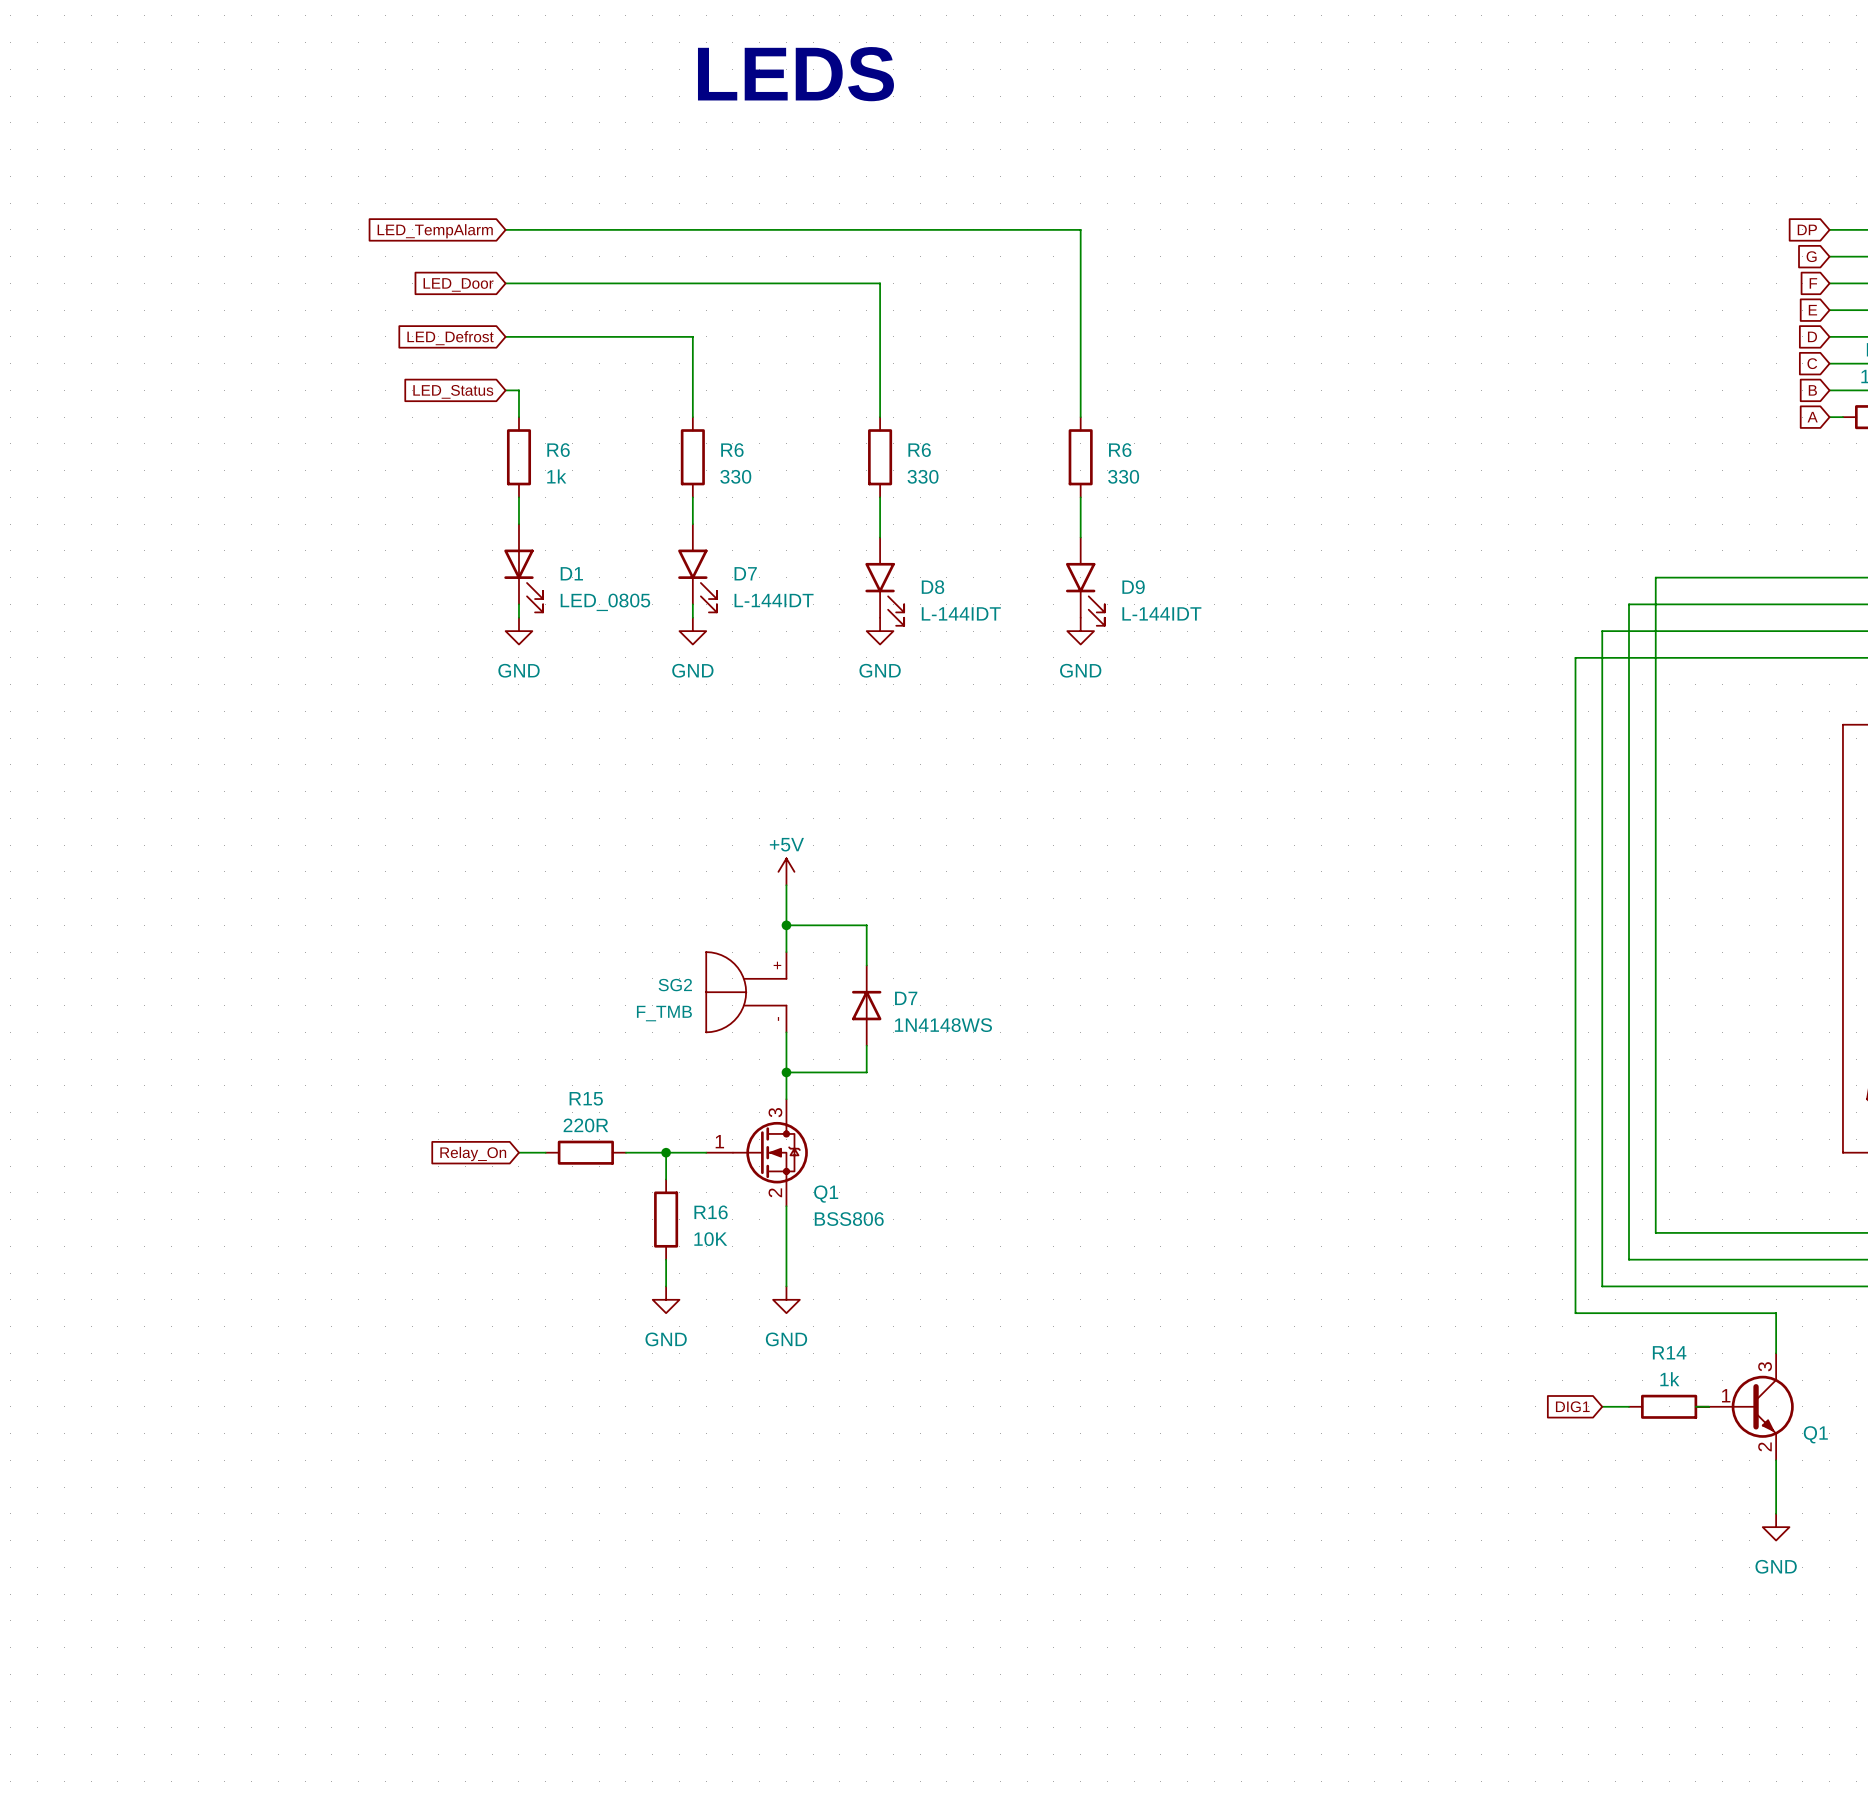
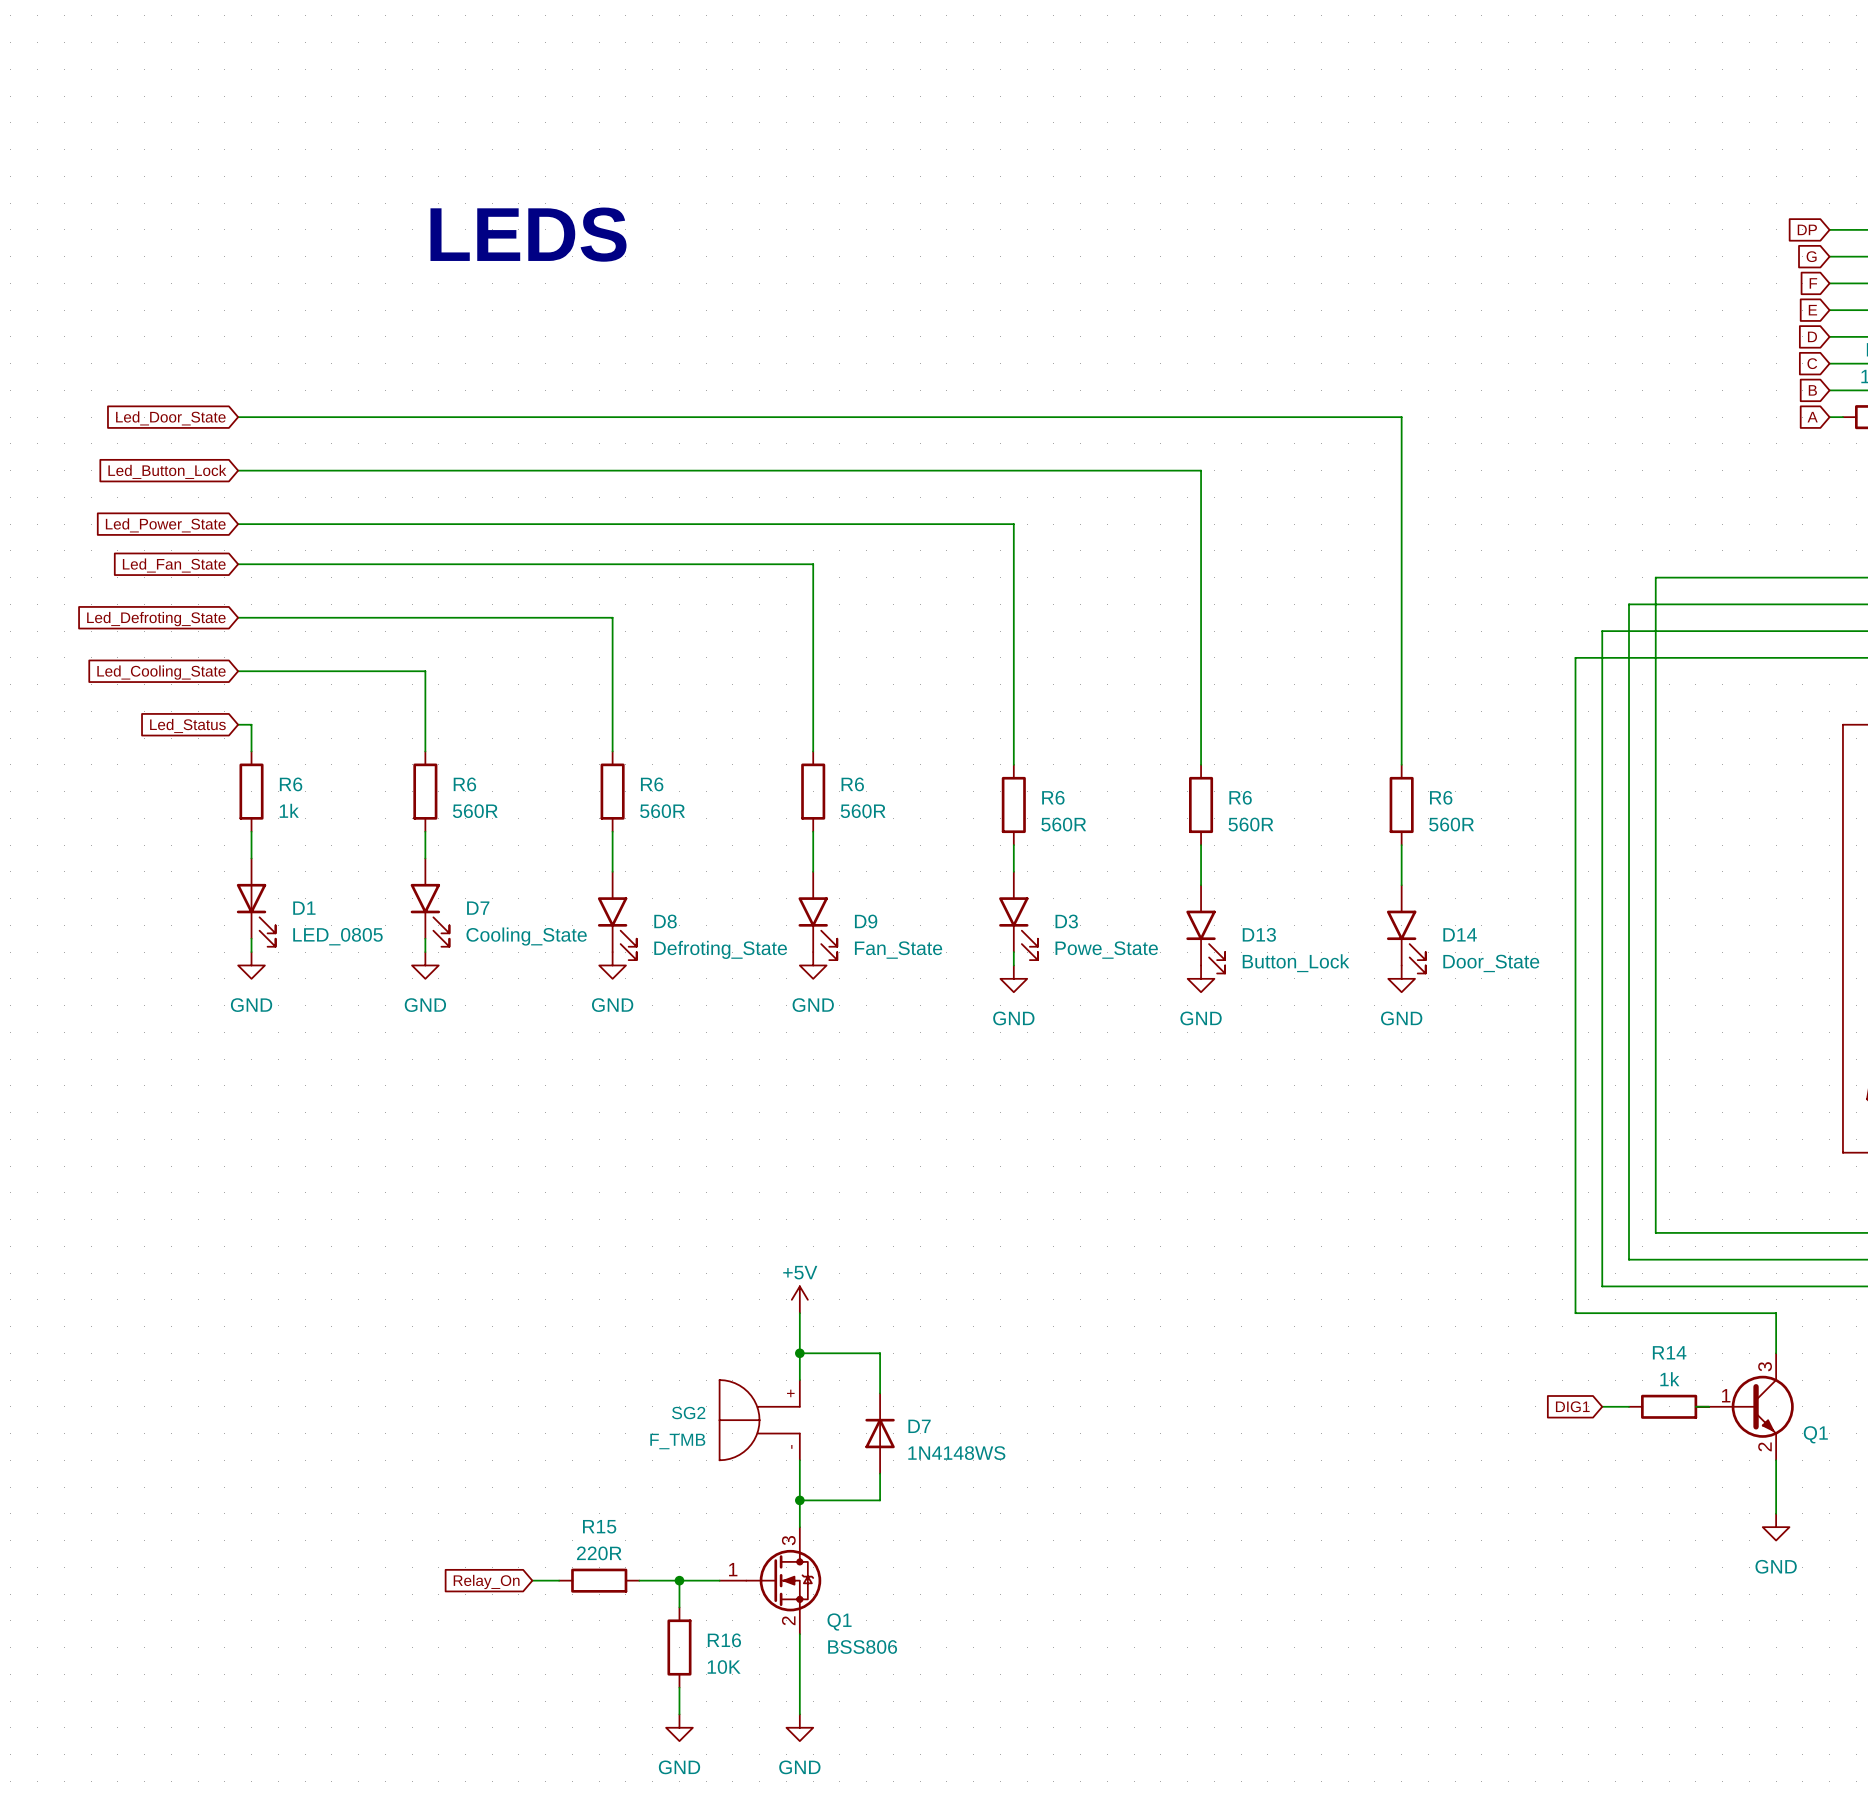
text: LEDS (795, 74) -> none
wire: (505, 229) (1080, 229) (1080, 417) -> none
global label: LED_TempAlarm (435, 231) -> none
text: none -> LEDS (528, 234)
wire: (505, 283) (880, 283) (880, 417) -> none
global label: LED_Door (458, 284) -> none
wire: (505, 336) (692, 336) (692, 417) -> none
global label: LED_Defrost (450, 338) -> none
wire: (505, 390) (518, 390) (518, 417) -> none
global label: LED_Status (453, 391) -> none
wire: none -> (238, 417) (1401, 417) (1401, 764)
global label: none -> Led_Door_State (170, 418)
R6: 1k (518, 457) -> none
R6: 330 (692, 457) -> none
R6: 330 (880, 457) -> none
R6: 330 (1080, 457) -> none
wire: none -> (238, 470) (1201, 470) (1201, 764)
global label: none -> Led_Button_Lock (167, 471)
wire: (518, 497) (518, 524) -> none
wire: (692, 497) (692, 524) -> none
wire: (880, 497) (880, 537) -> none
wire: (1080, 497) (1080, 537) -> none
wire: none -> (238, 524) (1013, 524) (1013, 764)
global label: none -> Led_Power_State (165, 525)
wire: none -> (238, 564) (813, 564) (813, 751)
global label: none -> Led_Fan_State (174, 565)
D1 position: (523, 568) -> (256, 902)
D7: L-144IDT (697, 568) -> none
D8 position: (884, 581) -> (617, 915)
D9 position: (1085, 581) -> (817, 915)
wire: (518, 604) (518, 617) -> none
wire: (692, 604) (692, 617) -> none
D8 value: L-144IDT (961, 613) -> Defroting_State (720, 949)
D9 value: L-144IDT (1161, 613) -> Fan_State (898, 950)
wire: none -> (238, 617) (612, 617) (612, 751)
global label: none -> Led_Defroting_State (156, 619)
power symbol: GND (518, 631) -> none
power symbol: GND (692, 631) -> none
power symbol: GND (880, 631) -> none
power symbol: GND (1080, 631) -> none
wire: none -> (238, 671) (425, 671) (425, 751)
global label: none -> Led_Cooling_State (161, 672)
wire: none -> (238, 724) (251, 724) (251, 751)
global label: none -> Led_Status (187, 725)
R6: none -> 1k (251, 791)
R6: none -> 560R (425, 791)
R6: none -> 560R (612, 791)
R6: none -> 560R (813, 791)
R6: none -> 560R (1013, 804)
R6: none -> 560R (1201, 804)
R6: none -> 560R (1401, 804)
wire: none -> (251, 831) (251, 858)
wire: none -> (425, 831) (425, 858)
wire: none -> (612, 831) (612, 871)
wire: none -> (813, 831) (813, 871)
wire: none -> (1013, 845) (1013, 871)
wire: none -> (1201, 845) (1201, 885)
wire: none -> (1401, 845) (1401, 885)
power symbol: +5V (786, 871) -> none
wire: (786, 885) (786, 952) -> none
D7: none -> Cooling_State (430, 902)
D3: none -> Powe_State (1018, 915)
wire: (786, 925) (866, 925) (866, 965) -> none
junction: (786, 925) -> none
D13: none -> Button_Lock (1205, 929)
D14: none -> Door_State (1406, 929)
wire: none -> (251, 938) (251, 952)
wire: none -> (425, 938) (425, 952)
wire: none -> (1013, 952) (1013, 965)
power symbol: none -> GND (251, 965)
power symbol: none -> GND (425, 965)
power symbol: none -> GND (612, 965)
power symbol: none -> GND (813, 965)
power symbol: none -> GND (1013, 978)
power symbol: none -> GND (1201, 978)
power symbol: none -> GND (1401, 978)
SG2 position: (746, 992) -> (759, 1420)
D7: 1N4148WS (866, 1005) -> none
wire: (786, 1032) (786, 1099) -> none
wire: (866, 1045) (866, 1072) (786, 1072) -> none
junction: (786, 1072) -> none
wire: (518, 1152) (545, 1152) -> none
R15 position: (585, 1152) -> (599, 1580)
wire: (625, 1152) (706, 1152) -> none
wire: (666, 1152) (666, 1179) -> none
junction: (666, 1152) -> none
Q1: BSS806 (757, 1152) -> none
global label: Relay_On (473, 1154) -> none
wire: (786, 1206) (786, 1286) -> none
R16 position: (666, 1219) -> (679, 1647)
wire: (666, 1259) (666, 1286) -> none
power symbol: GND (666, 1299) -> none
power symbol: GND (786, 1299) -> none
power symbol: none -> +5V (799, 1299)
wire: none -> (799, 1313) (799, 1380)
wire: none -> (799, 1353) (880, 1353) (880, 1393)
junction: none -> (799, 1353)
D7: none -> 1N4148WS (880, 1433)
wire: none -> (799, 1460) (799, 1527)
wire: none -> (880, 1473) (880, 1500) (799, 1500)
junction: none -> (799, 1500)
wire: none -> (532, 1580) (559, 1580)
wire: none -> (639, 1580) (719, 1580)
wire: none -> (679, 1580) (679, 1607)
junction: none -> (679, 1580)
Q1: none -> BSS806 (770, 1580)
global label: none -> Relay_On (486, 1581)
wire: none -> (799, 1634) (799, 1714)
wire: none -> (679, 1687) (679, 1714)
power symbol: none -> GND (679, 1727)
power symbol: none -> GND (799, 1727)

